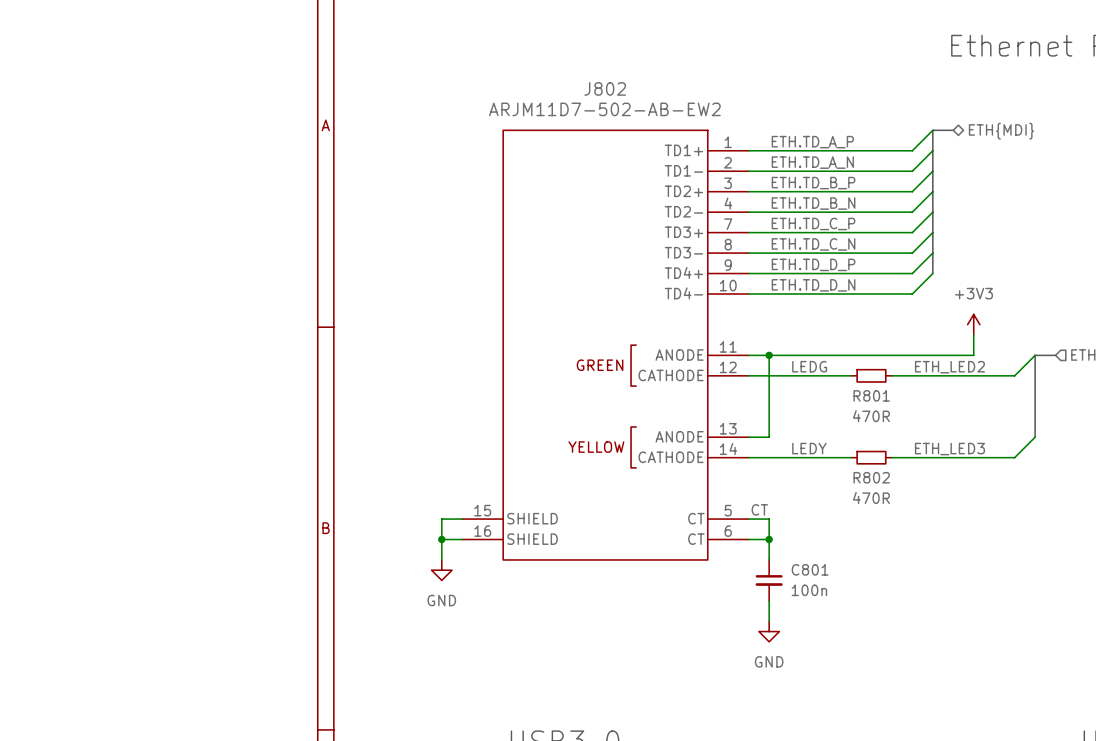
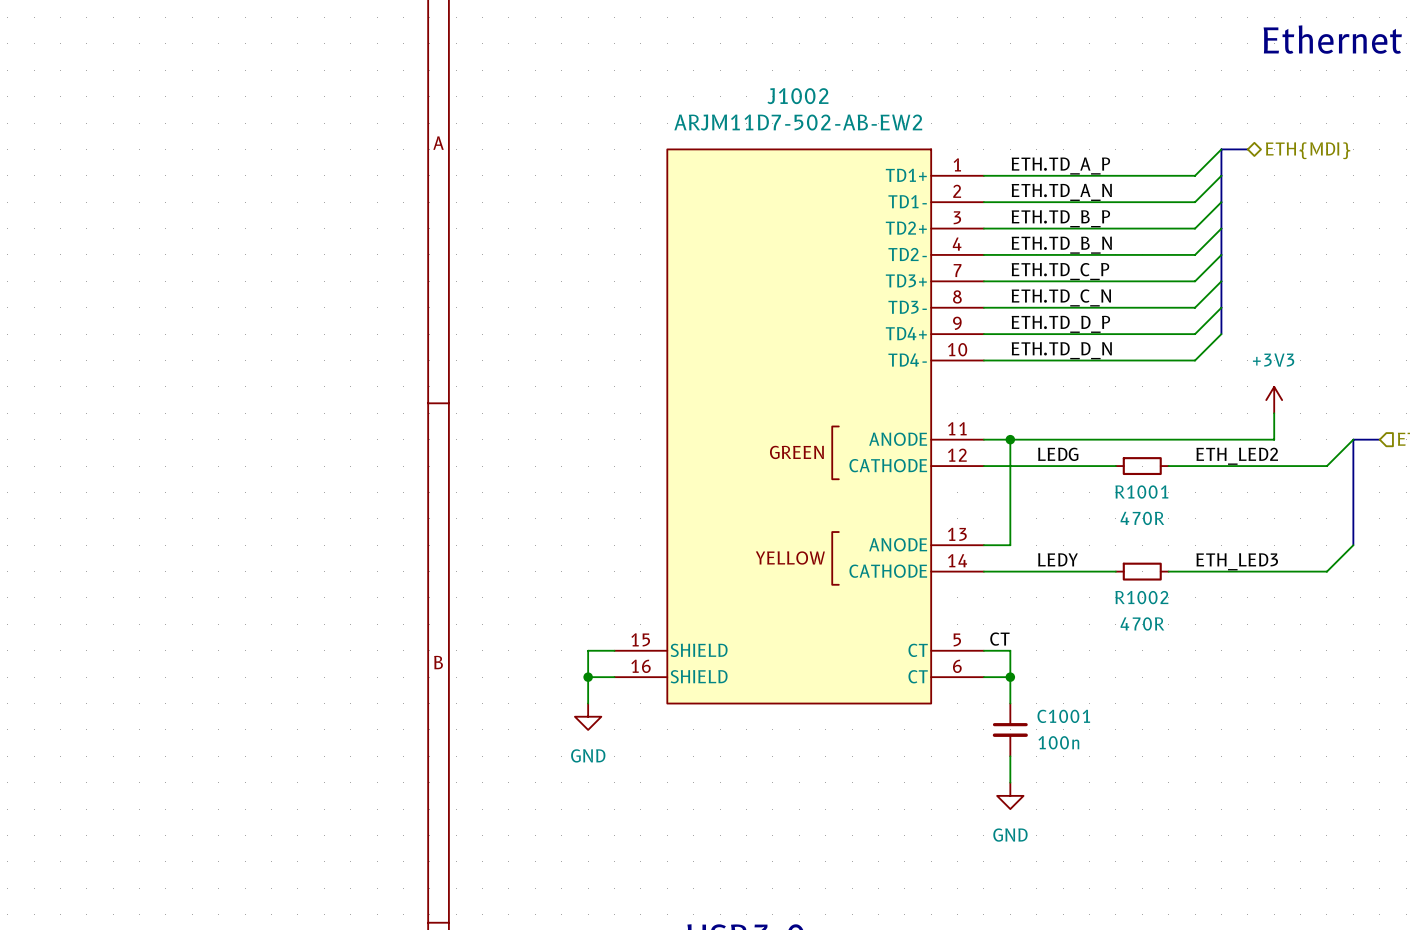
J802 name: J802 (605, 88) -> J1002 (797, 96)
R801 name: R801 (871, 395) -> R1001 (1141, 492)
R802 name: R802 (871, 477) -> R1002 (1141, 597)
C801 name: C801 (810, 569) -> C1001 (1063, 716)

